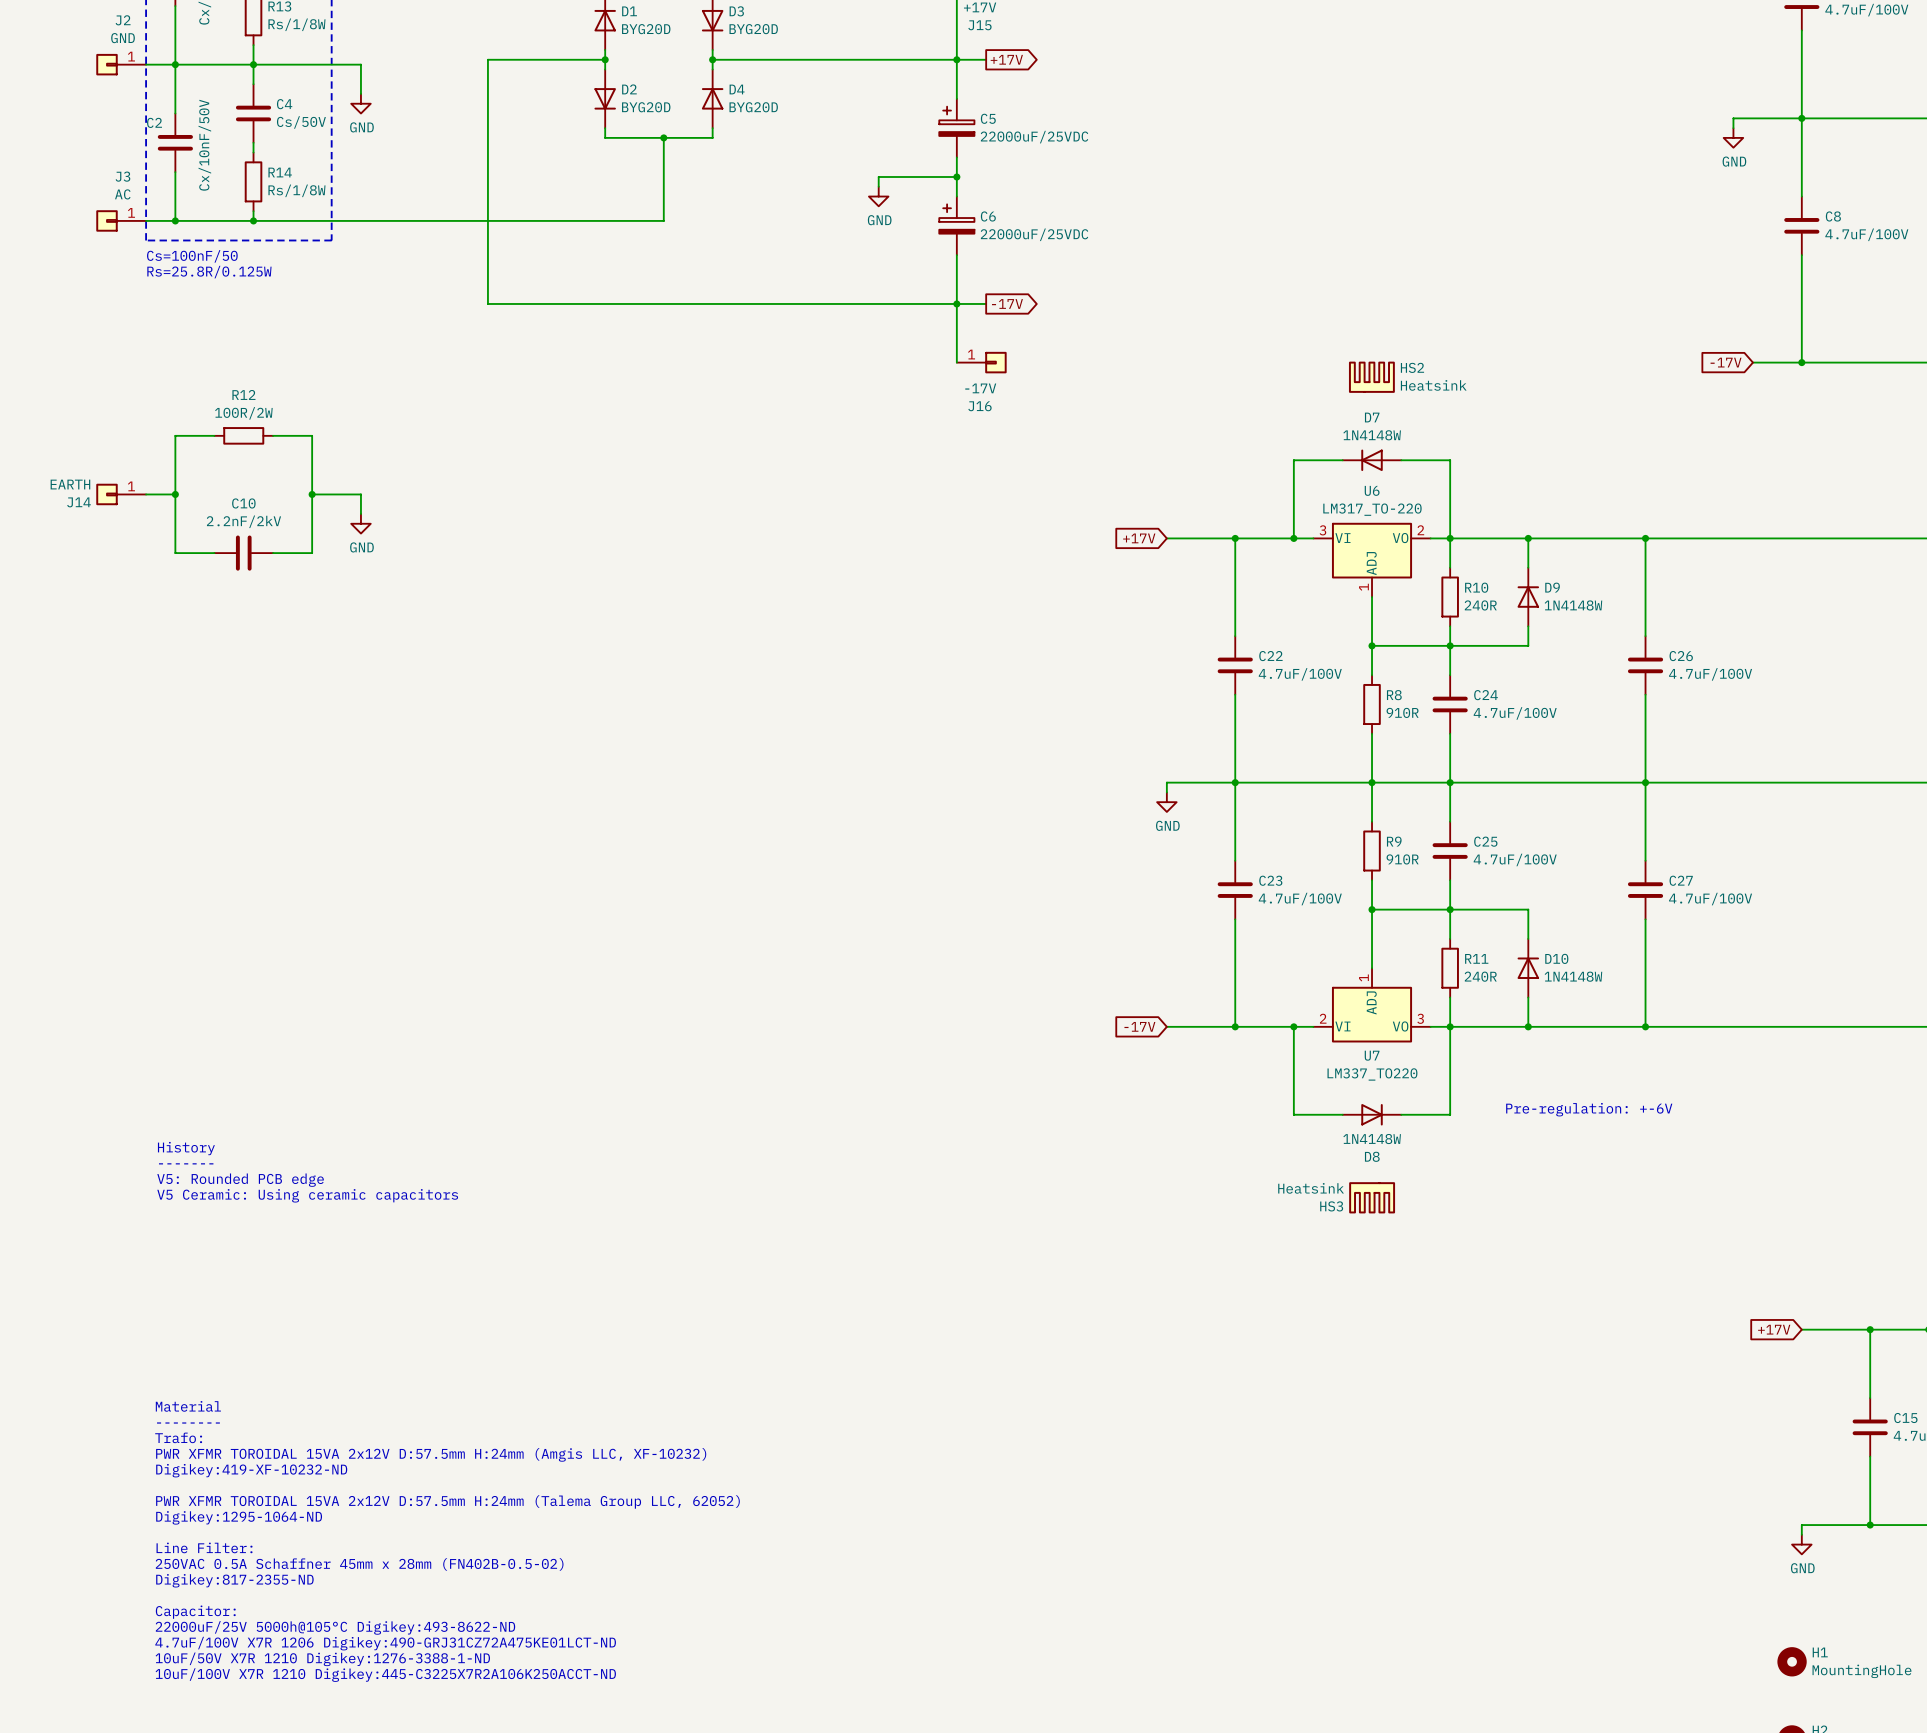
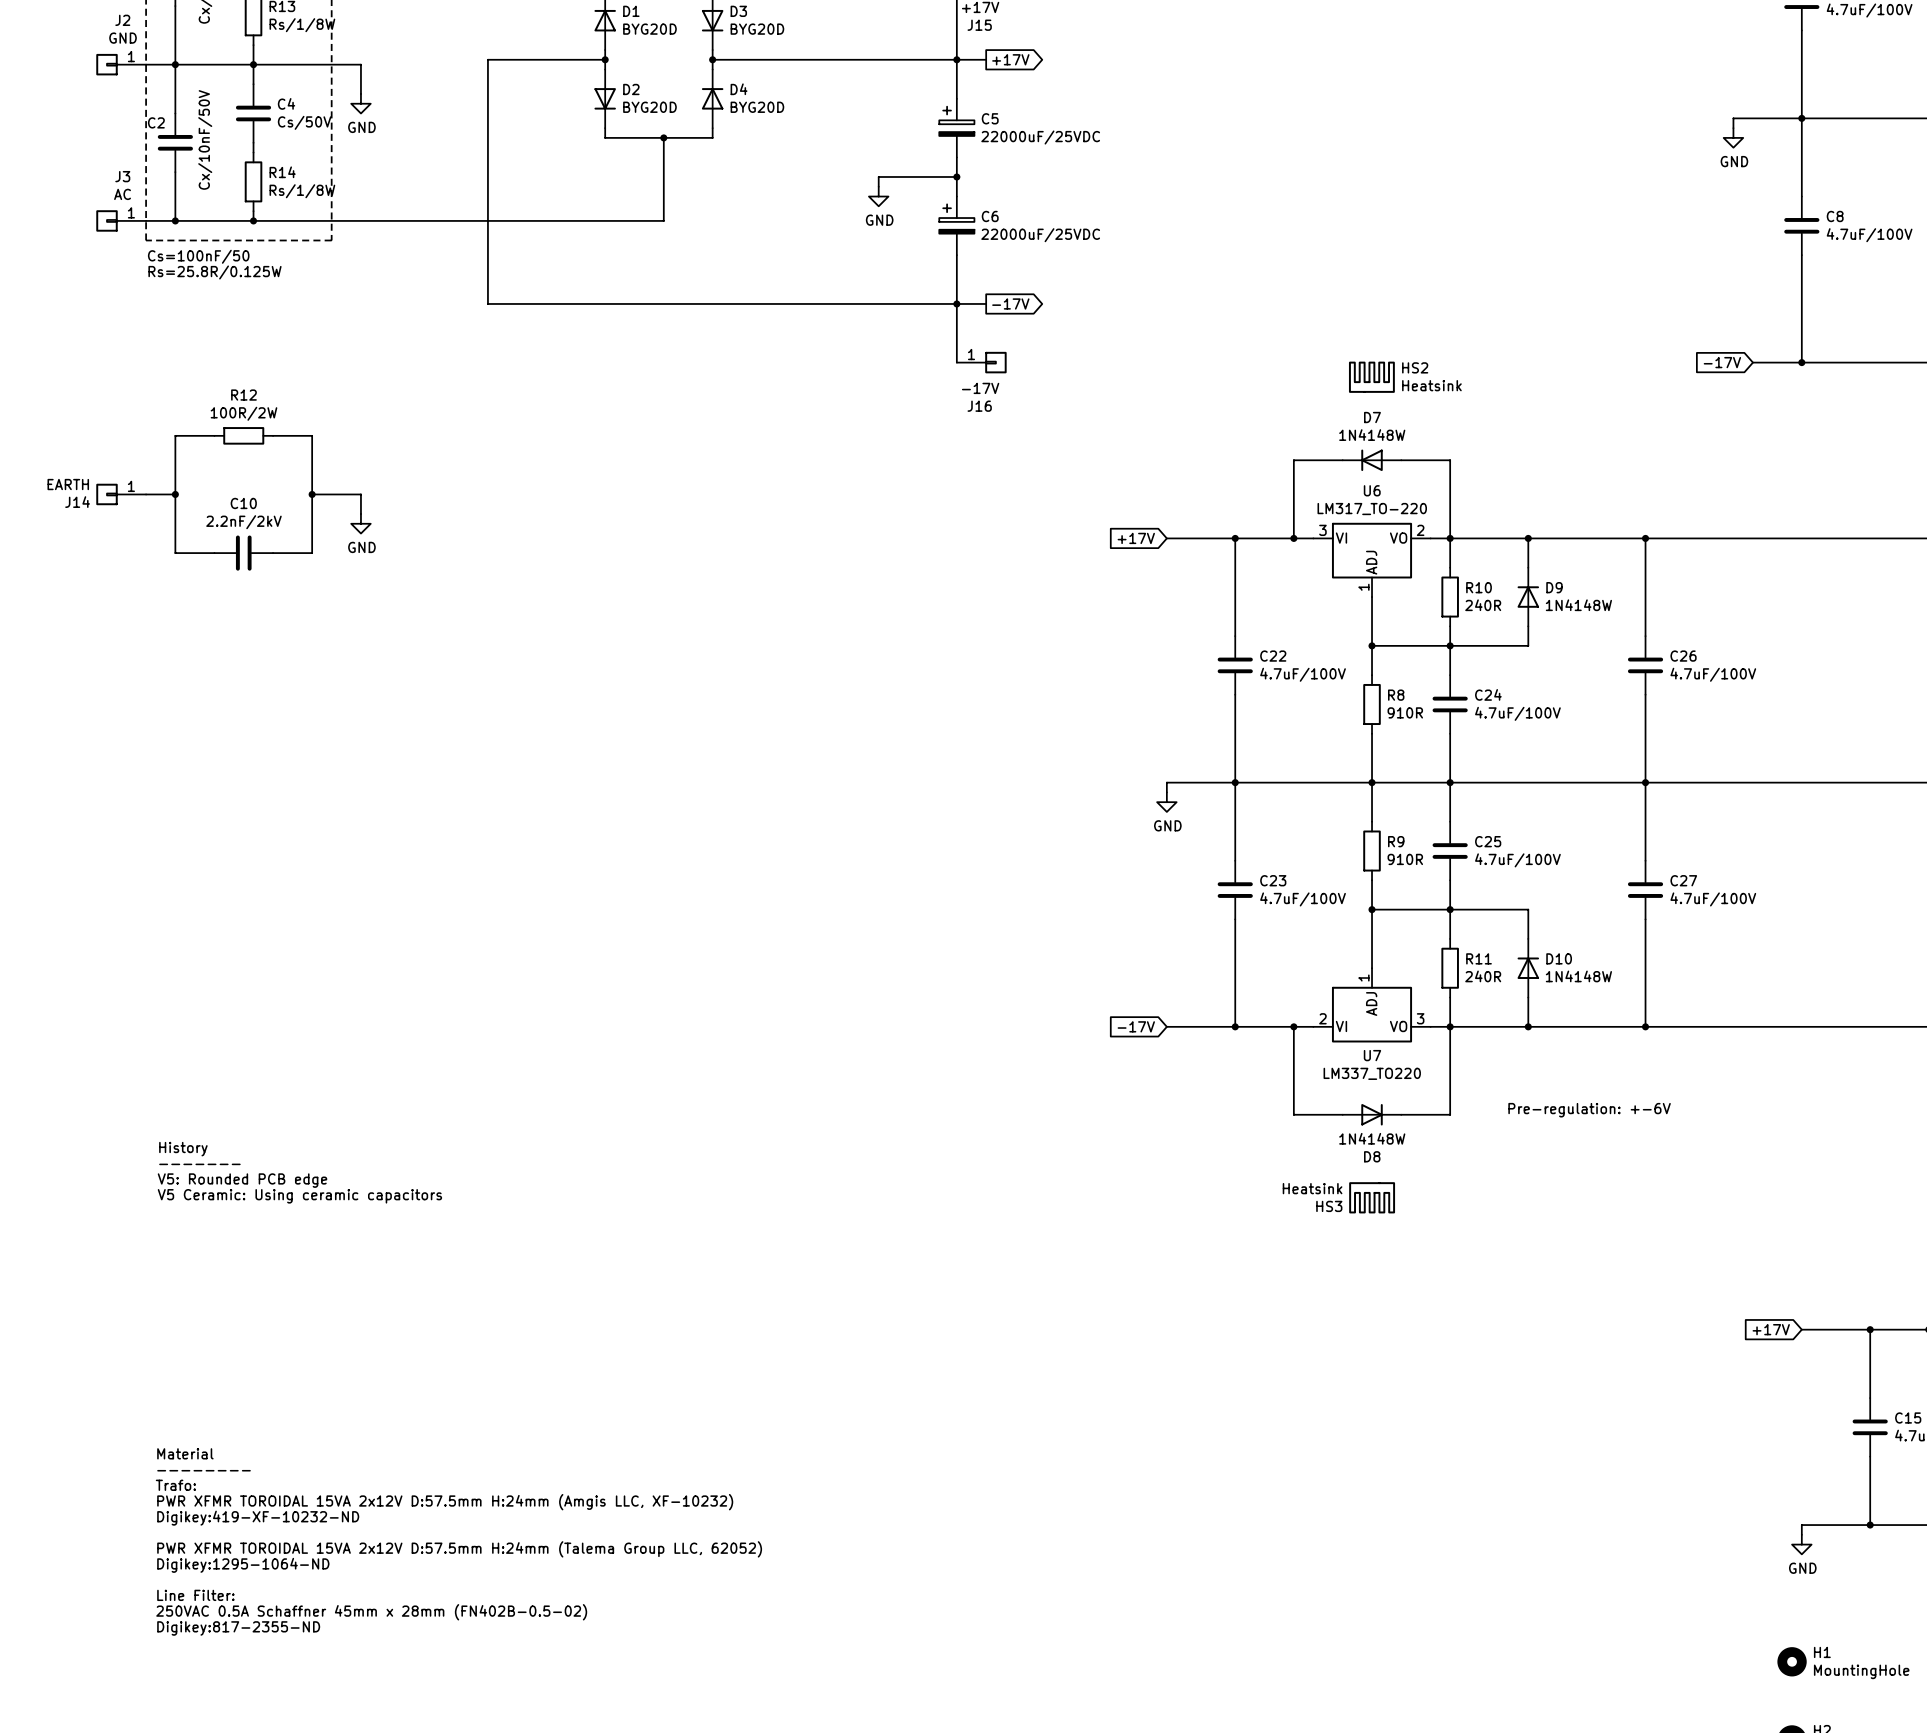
text: Material (188, 1406) -> none
text: -------- (188, 1423) -> none
text position: Trafo: (178, 1437) -> Trafo: (175, 1485)
text: PWR XFMR TOROIDAL 15VA 2x12V D:57.5mm H:24mm (Amgis LLC, XF-10232) (431, 1454) -> Material (185, 1453)
text: Digikey:419-XF-10232-ND (251, 1470) -> -------- (204, 1470)
text: PWR XFMR TOROIDAL 15VA 2x12V D:57.5mm H:24mm (Talema Group LLC, 62052) (447, 1501) -> PWR XFMR TOROIDAL 15VA 2x12V D:57.5mm H:24mm (Amgis LLC, XF-10232) (445, 1502)
text: Digikey:1295-1064-ND (239, 1517) -> Digikey:419-XF-10232-ND (258, 1518)
text: Line Filter: (204, 1547) -> PWR XFMR TOROIDAL 15VA 2x12V D:57.5mm H:24mm (Talema Group LLC, 62052) (459, 1549)
text: 250VAC 0.5A Schaffner 45mm x 28mm (FN402B-0.5-02) (359, 1564) -> Digikey:1295-1064-ND (243, 1565)
text: Digikey:817-2355-ND (234, 1580) -> none
text: none -> Line Filter: (195, 1595)
text: Capacitor: (195, 1612) -> 250VAC 0.5A Schaffner 45mm x 28mm (FN402B-0.5-02) (371, 1612)
text: 22000uF/25V 5000h@105°C Digikey:493-8622-ND (335, 1627) -> Digikey:817-2355-ND (238, 1628)
text: 4.7uF/100V X7R 1206 Digikey:490-GRJ31CZ72A475KE01LCT-ND (385, 1643) -> none
text: 10uF/50V X7R 1210 Digikey:1276-3388-1-ND (322, 1659) -> none
text: 10uF/100V X7R 1210 Digikey:445-C3225X7R2A106K250ACCT-ND (385, 1675) -> none

